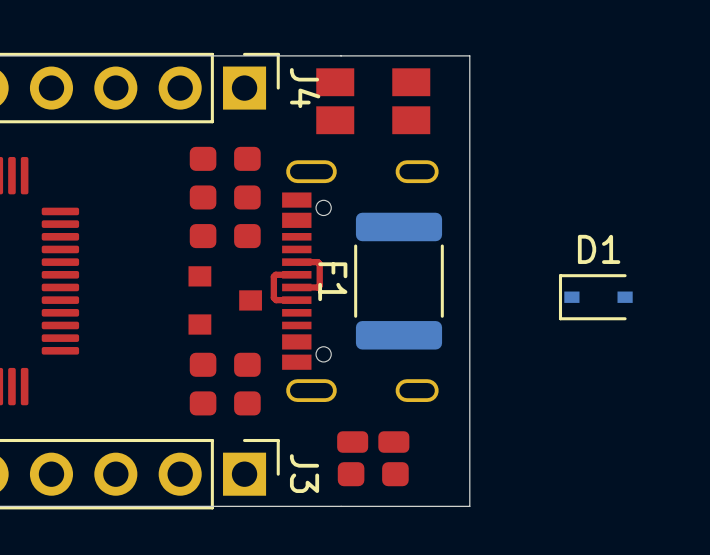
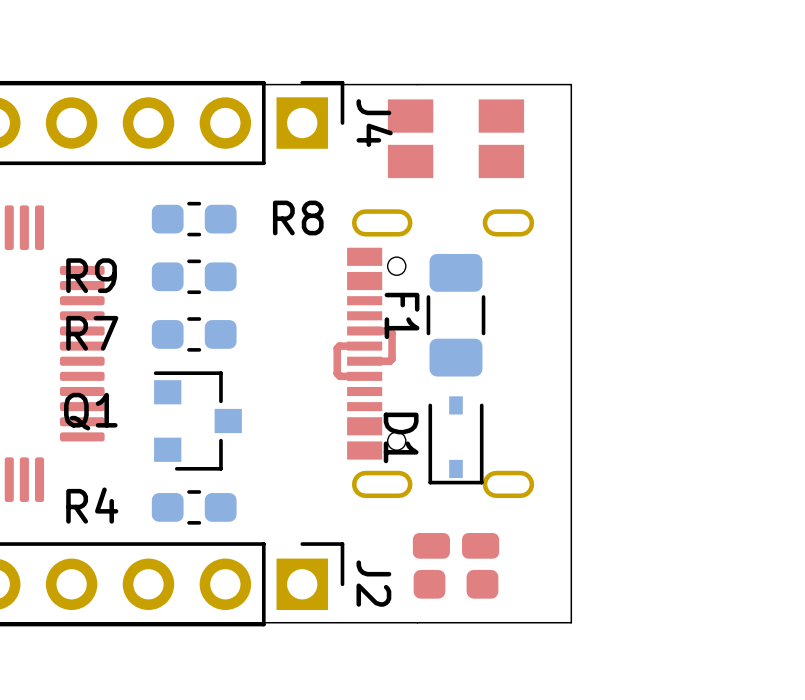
R7 side: top (225, 158) -> bottom (194, 334)
R8 side: top (225, 197) -> bottom (194, 219)
F1 footprint: [354, 212, 444, 350] -> [426, 253, 486, 377]
R9: none -> (194, 276)
part: (225, 236) -> none
D1 rotation: 0° (595, 297) -> 90° counterclockwise (455, 440)
D1 position: (595, 297) -> (455, 440)
Q1 side: top (225, 300) -> bottom (197, 421)
R4 side: top (225, 364) -> bottom (194, 507)
part: (225, 403) -> none
J3 name: J3 (304, 473) -> J2 (373, 583)

